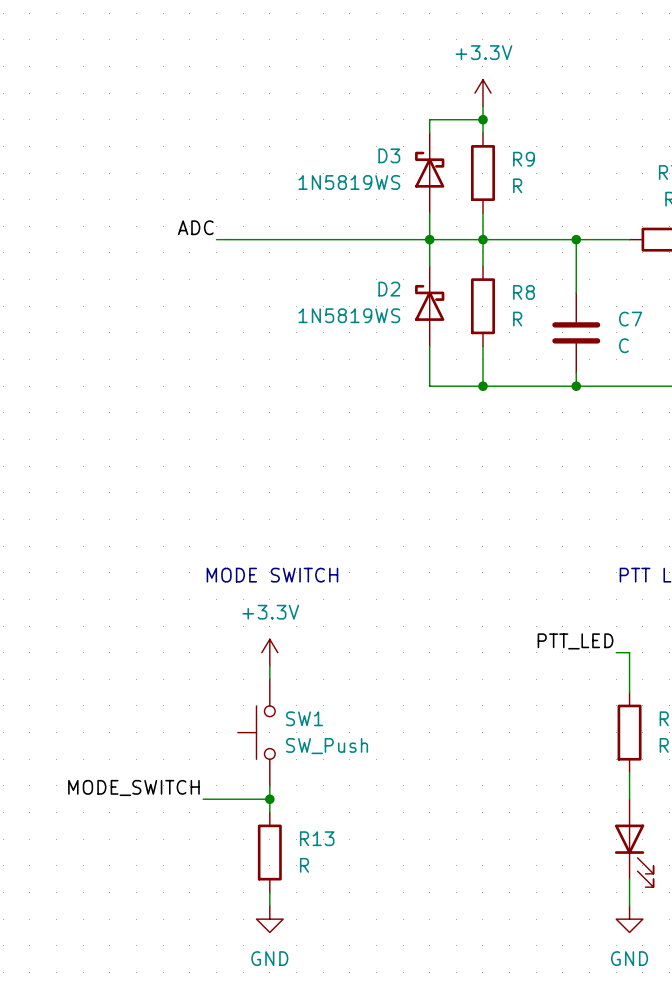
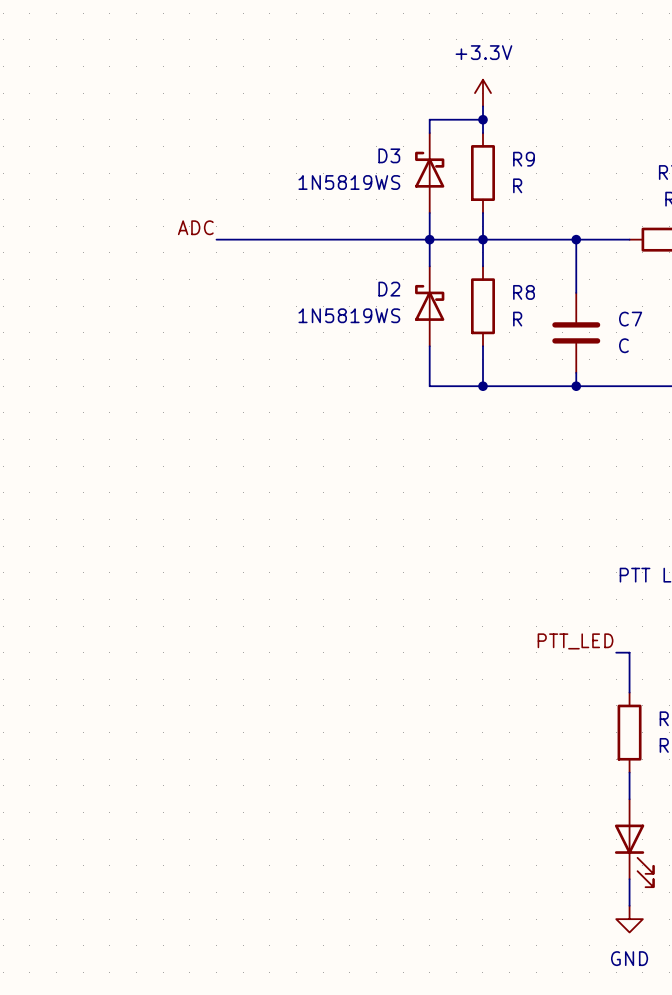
text: MODE SWITCH (272, 575) -> none
power symbol: +3.3V (269, 652) -> none
wire: (269, 665) (269, 679) -> none
SW1: SW_Push (256, 732) -> none
wire: (269, 785) (269, 812) -> none
label: MODE_SWITCH (133, 787) -> none
wire: (203, 799) (269, 799) -> none
junction: (269, 799) -> none
R13: R (269, 852) -> none
wire: (269, 892) (269, 905) -> none
power symbol: GND (269, 919) -> none

